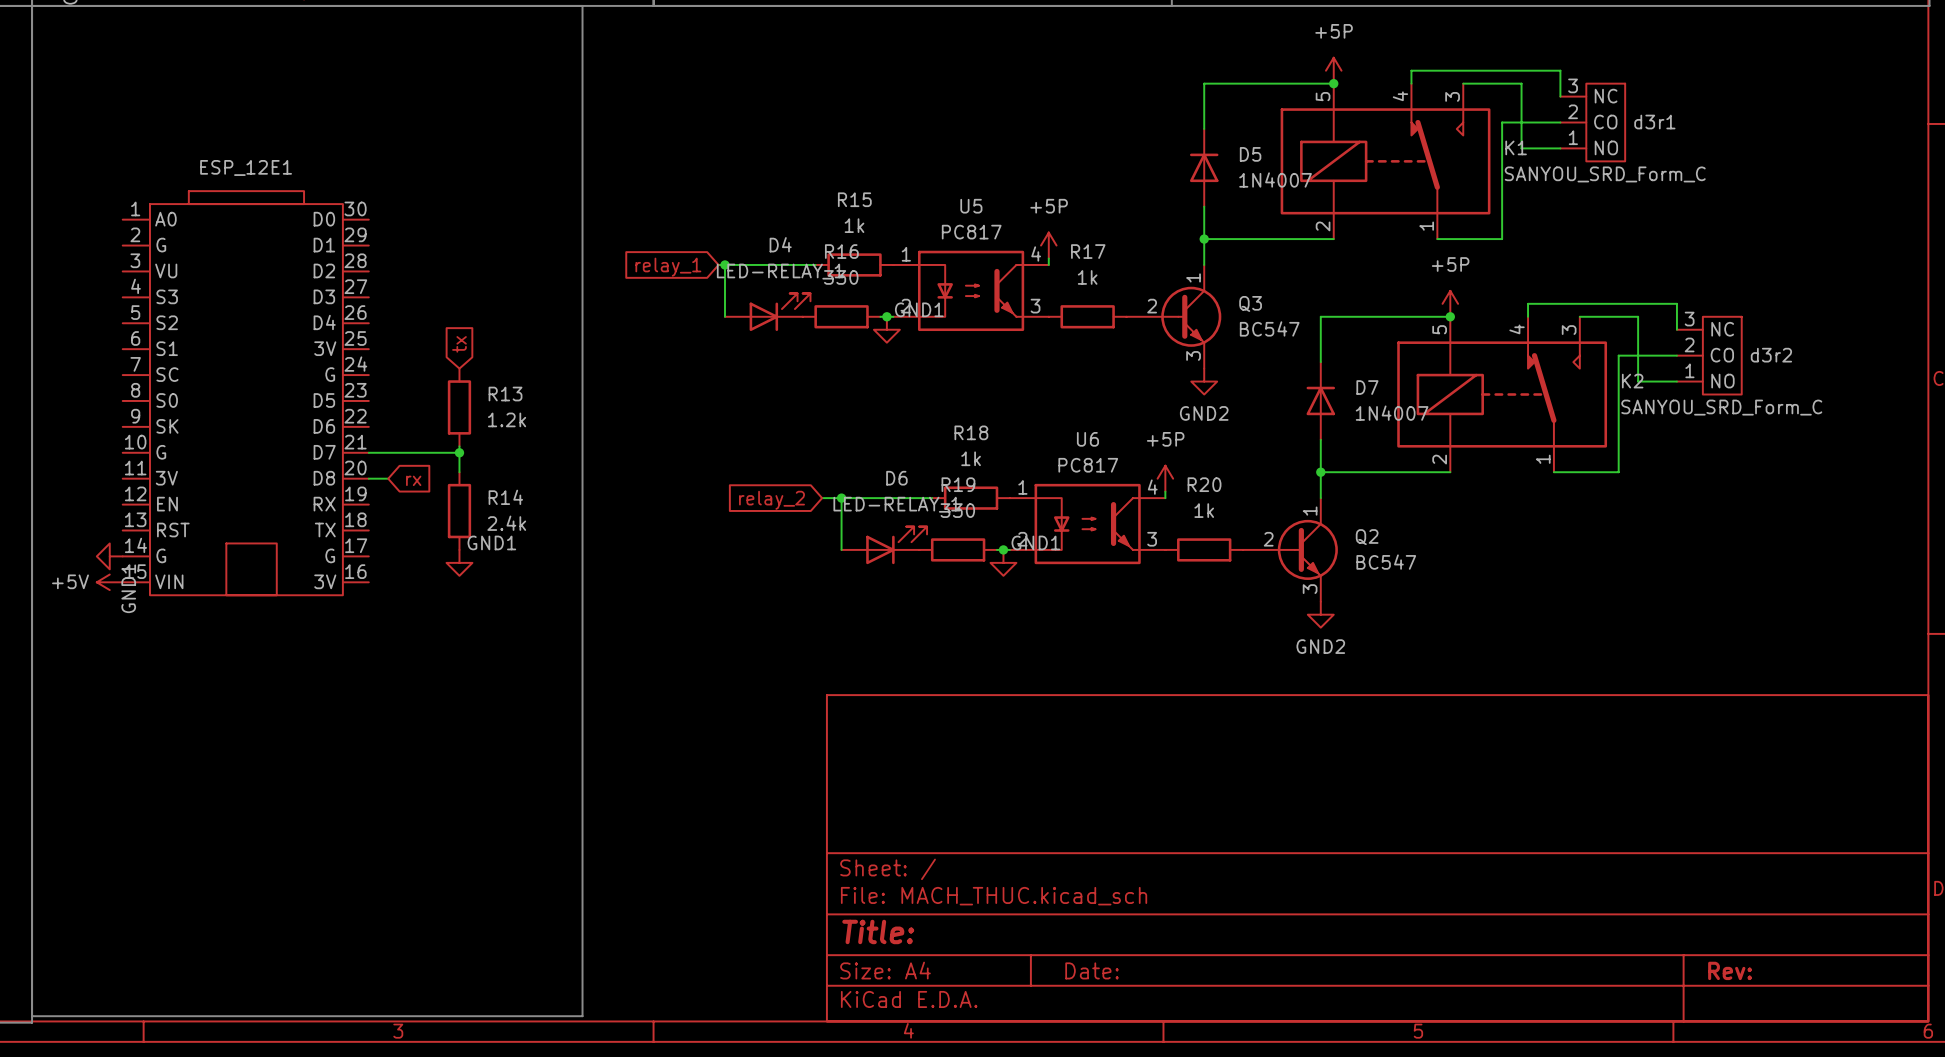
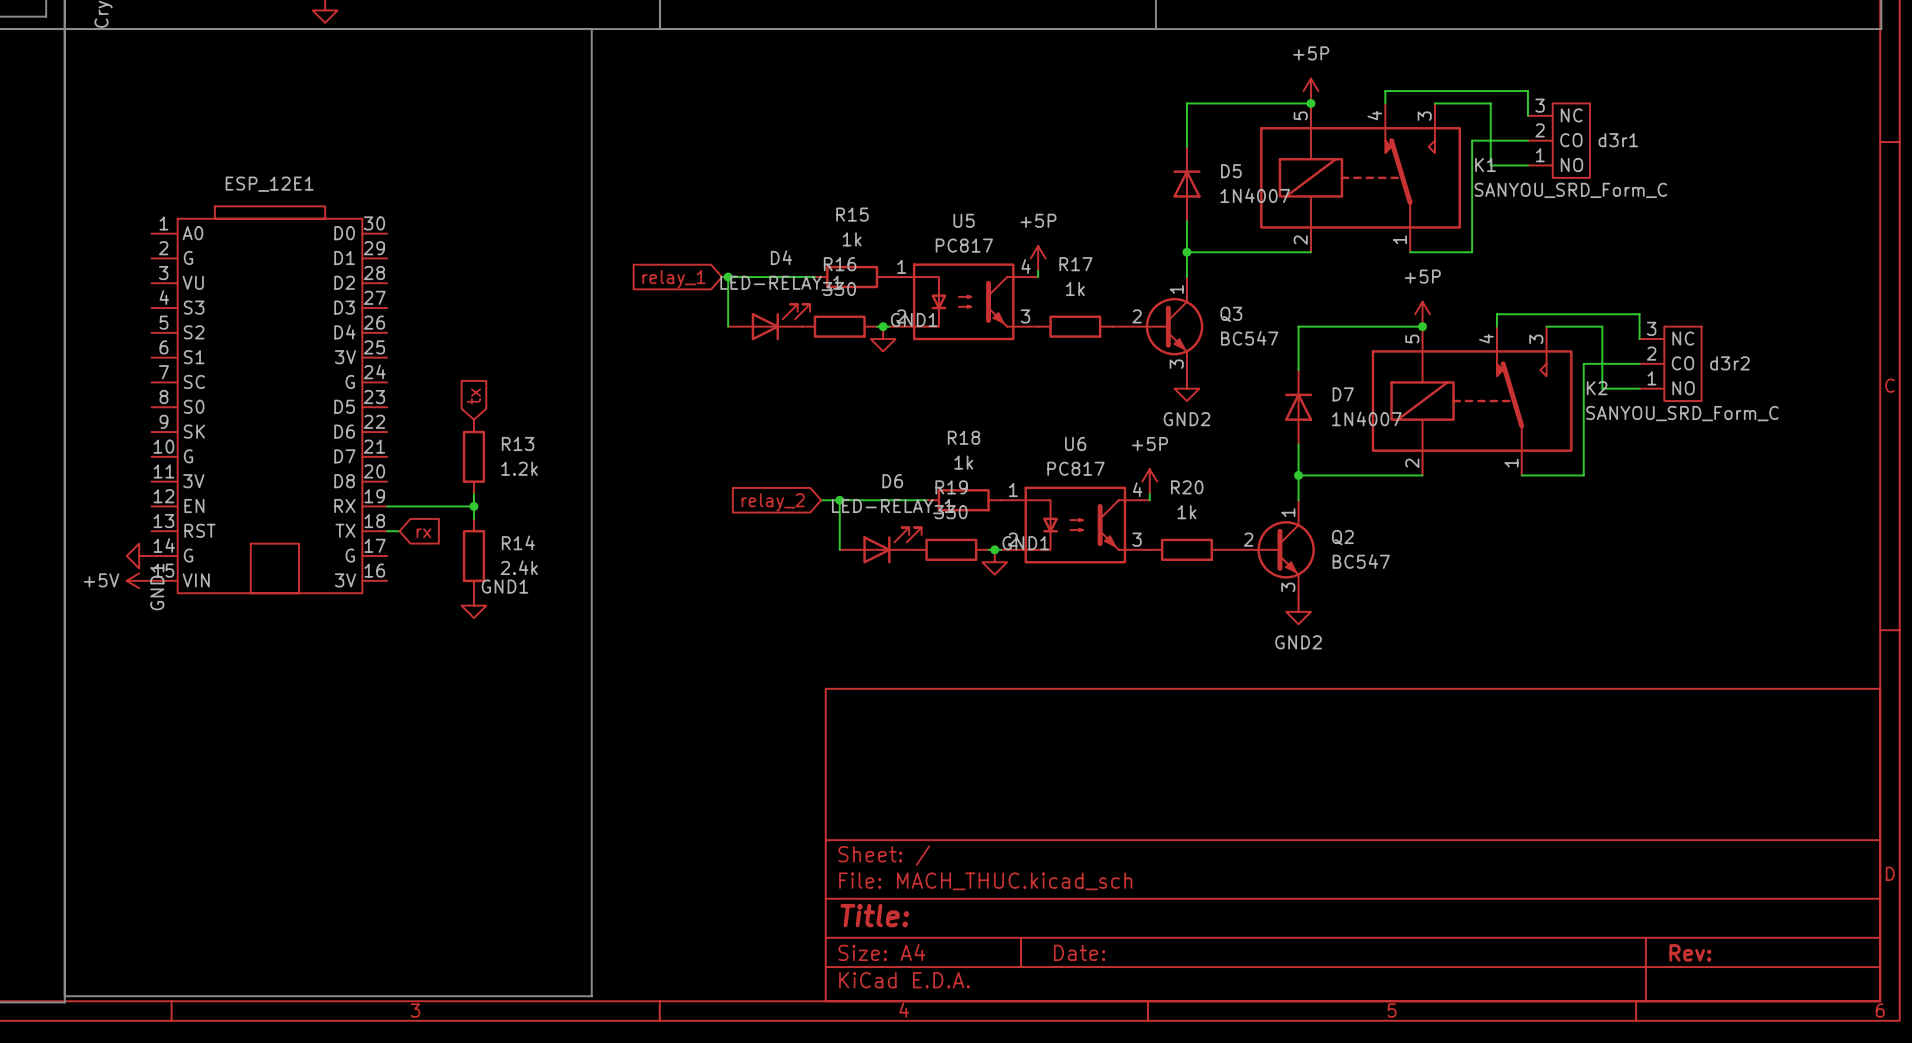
global label position: tx (459, 344) -> tx (473, 396)
R13 position: (459, 407) -> (473, 456)
wire: (459, 446) (459, 472) -> (473, 494) (473, 518)
wire: (368, 452) (459, 452) -> (387, 506) (473, 506)
junction position: (459, 452) -> (473, 506)
wire: (368, 478) (388, 478) -> none
global label position: rx (413, 480) -> rx (423, 533)
R14 position: (459, 511) -> (473, 556)
wire: none -> (387, 531) (399, 531)
power symbol position: GND1 (459, 562) -> GND1 (473, 605)

